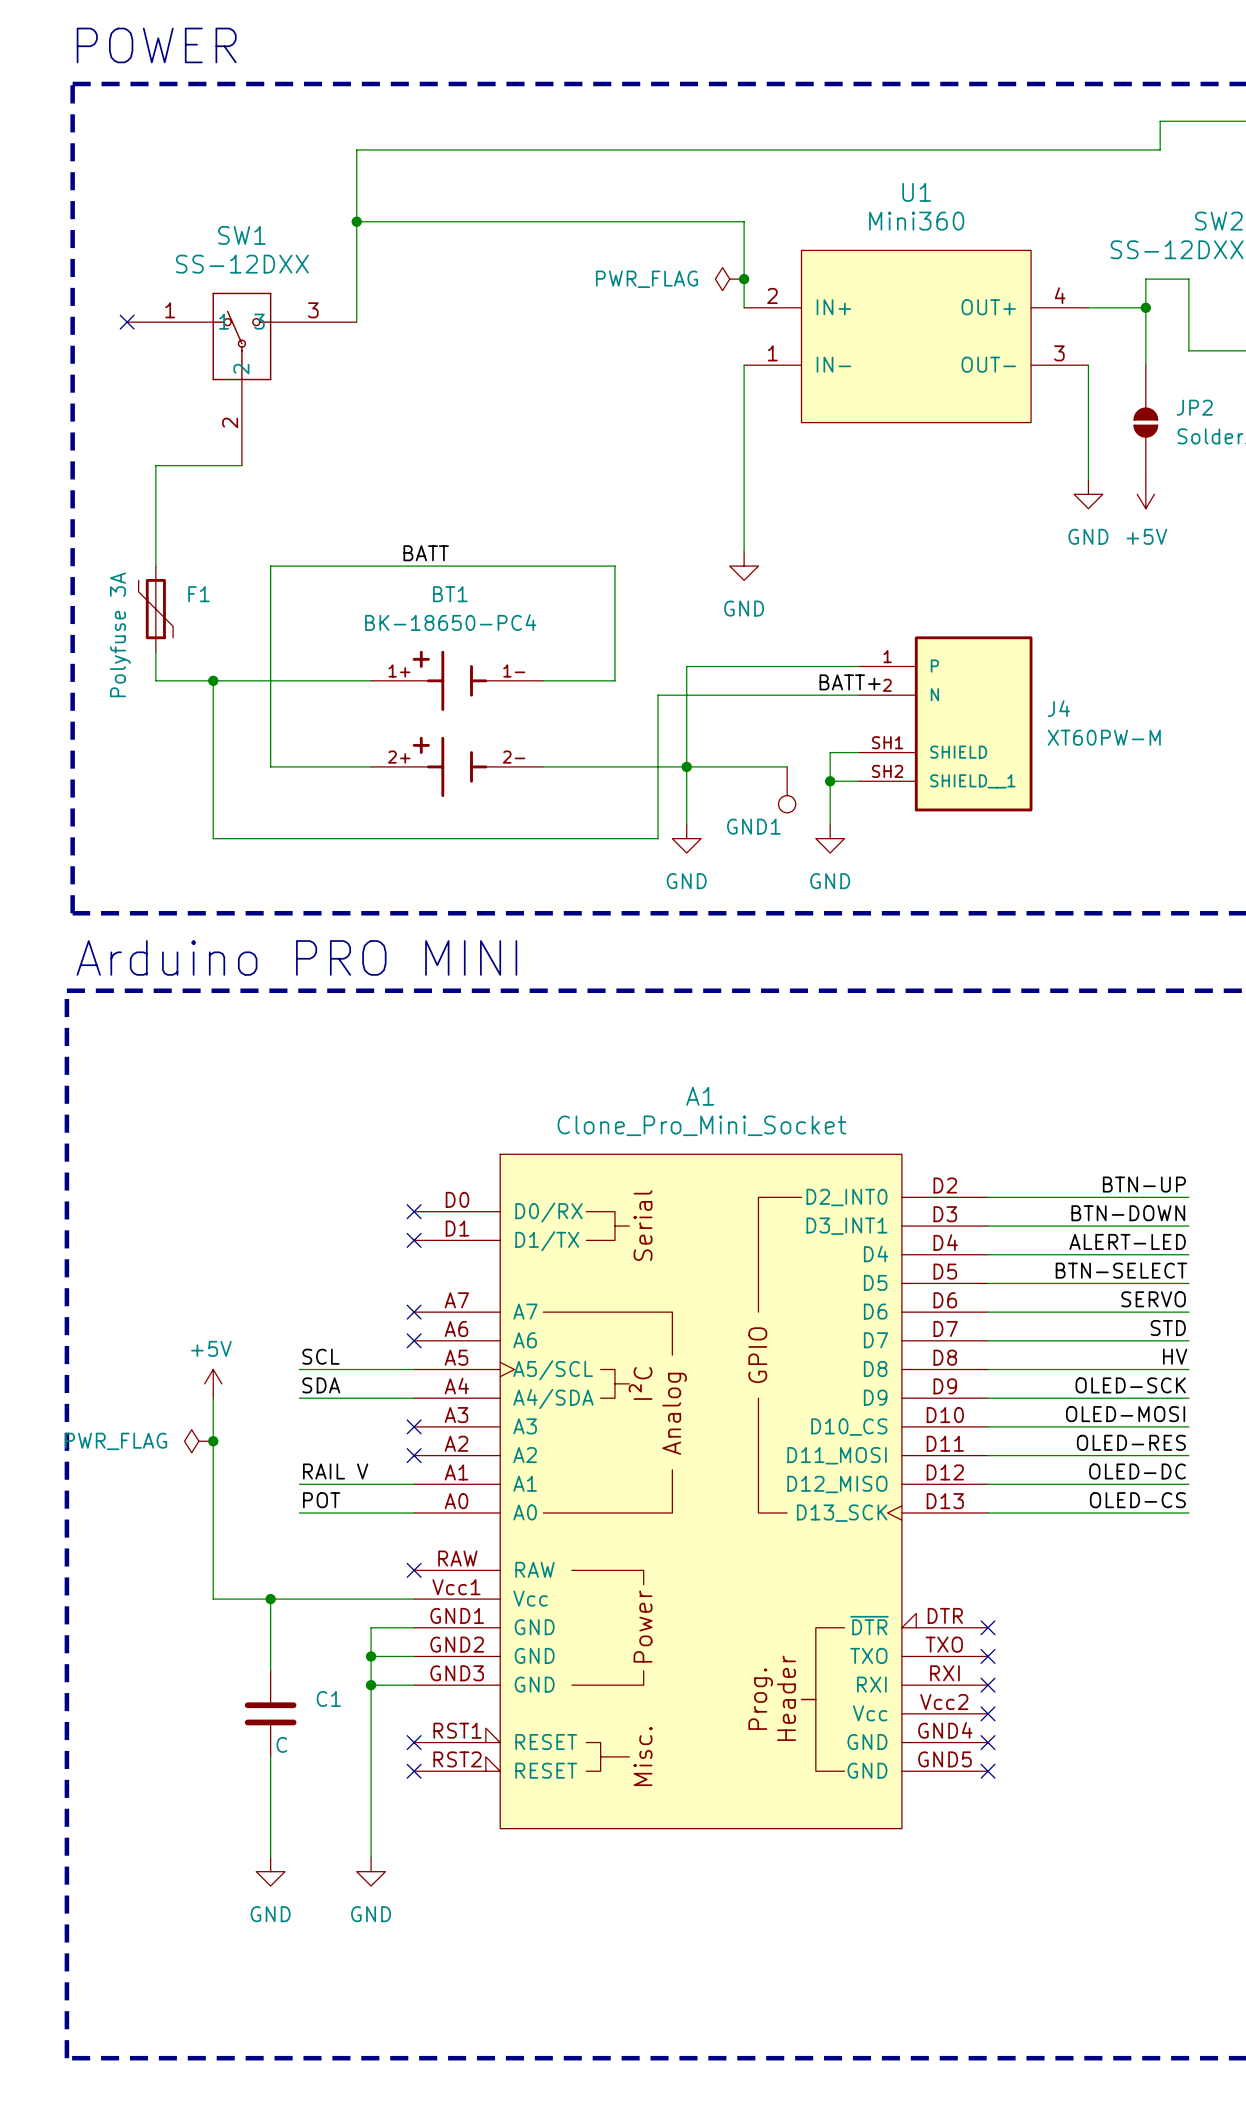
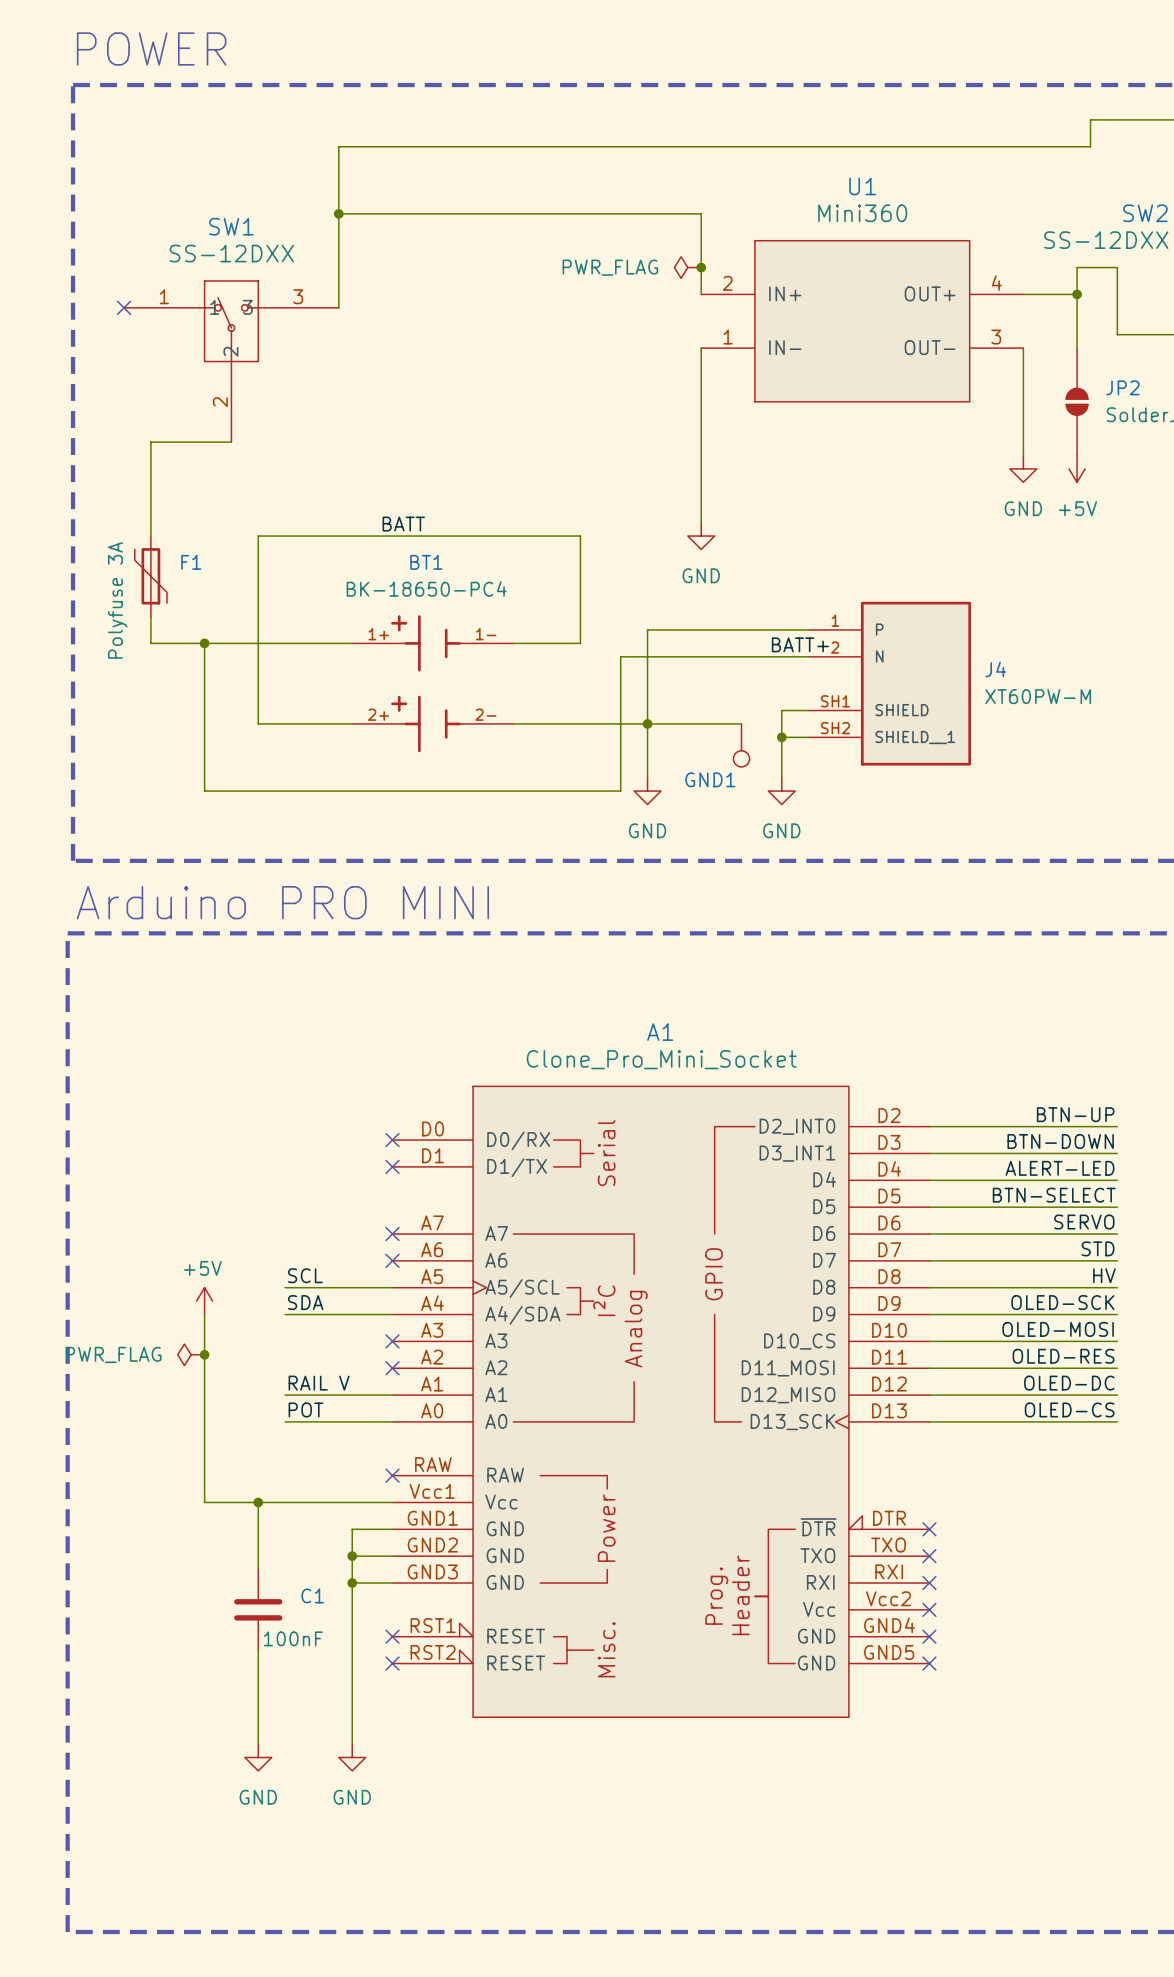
C1 value: C (281, 1744) -> 100nF (293, 1638)

